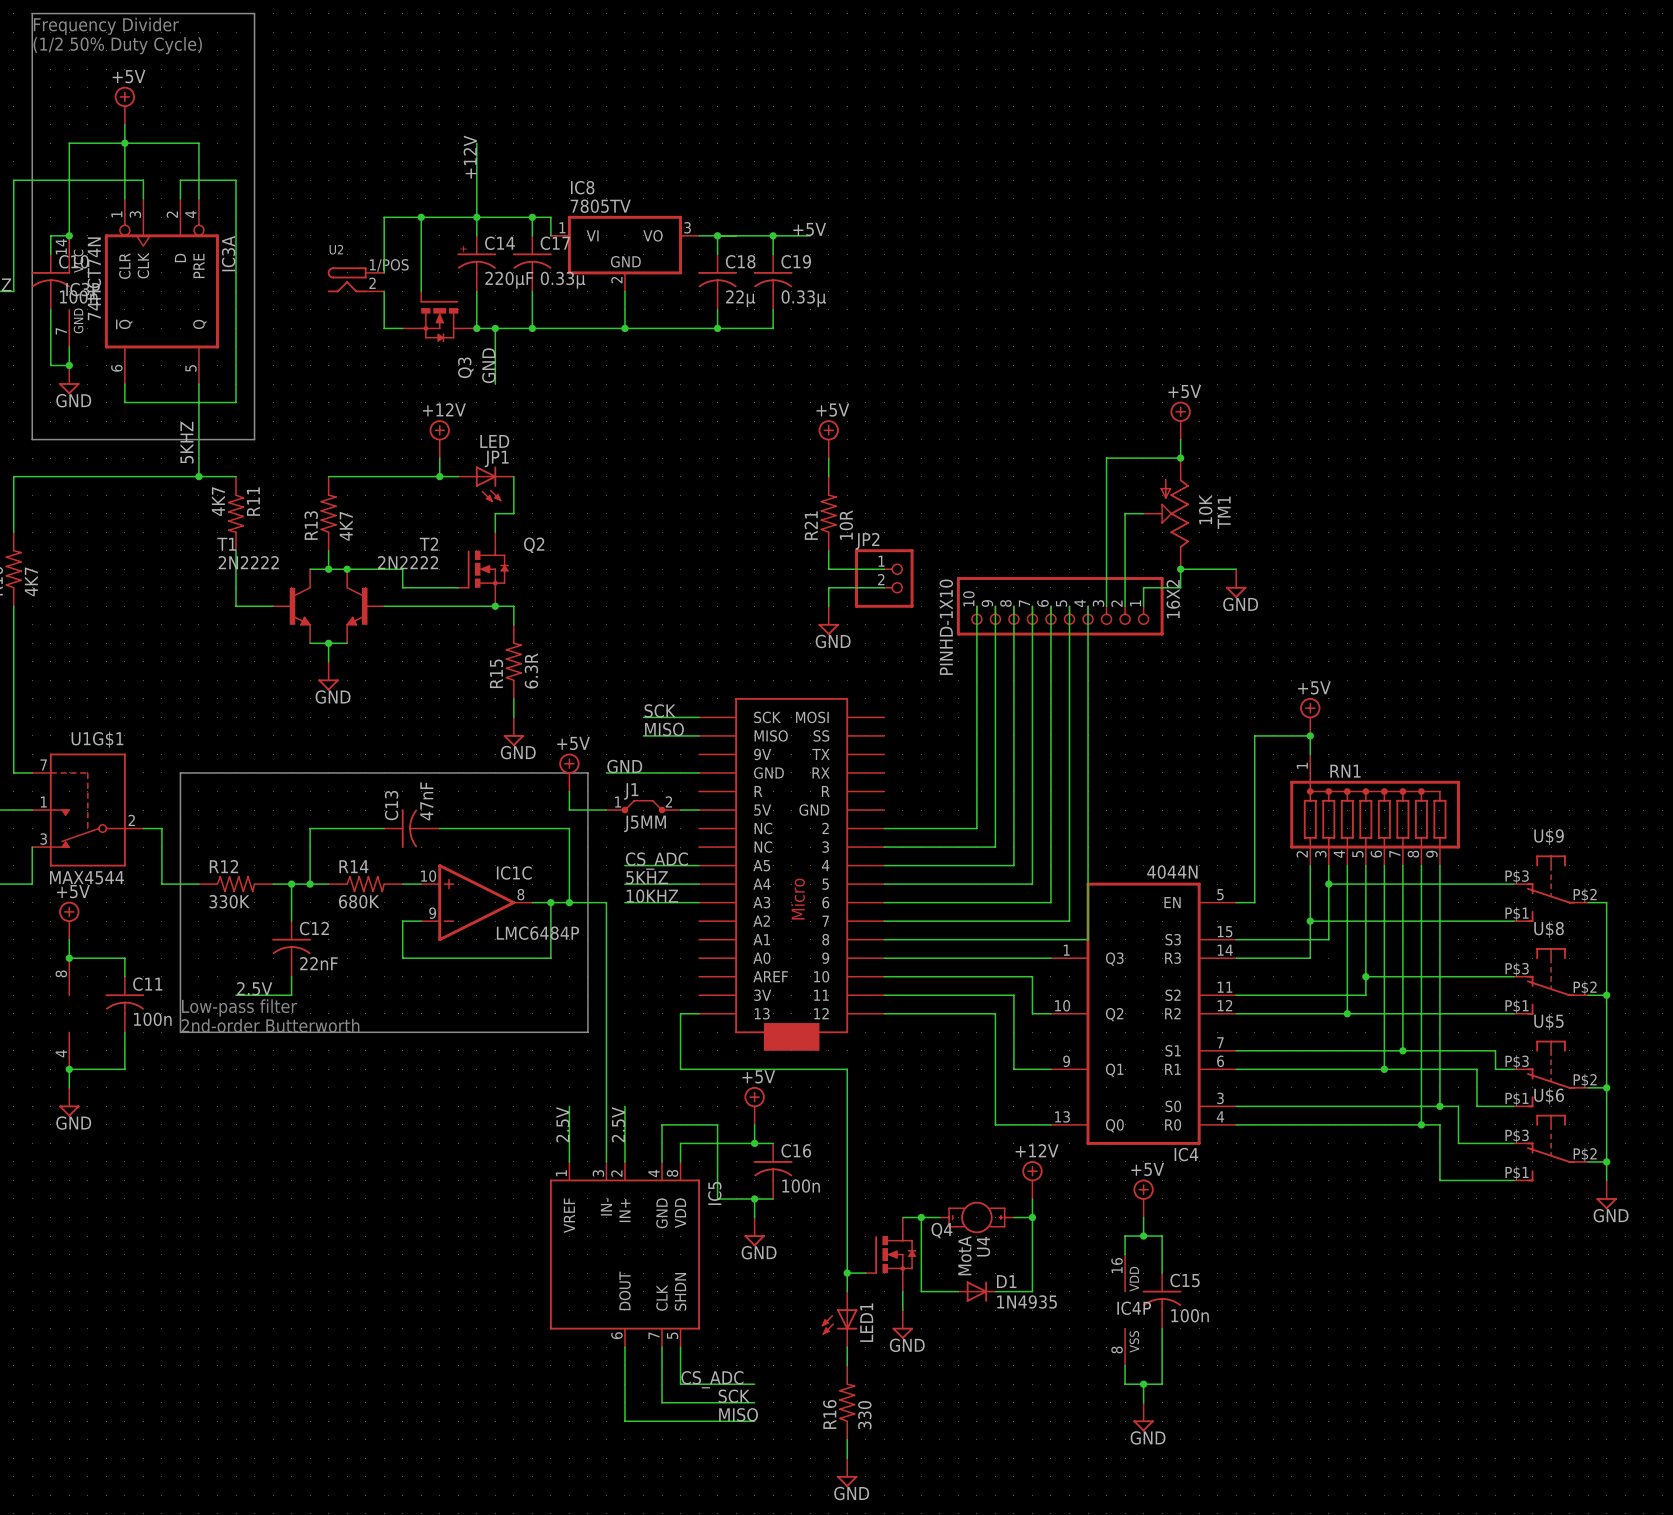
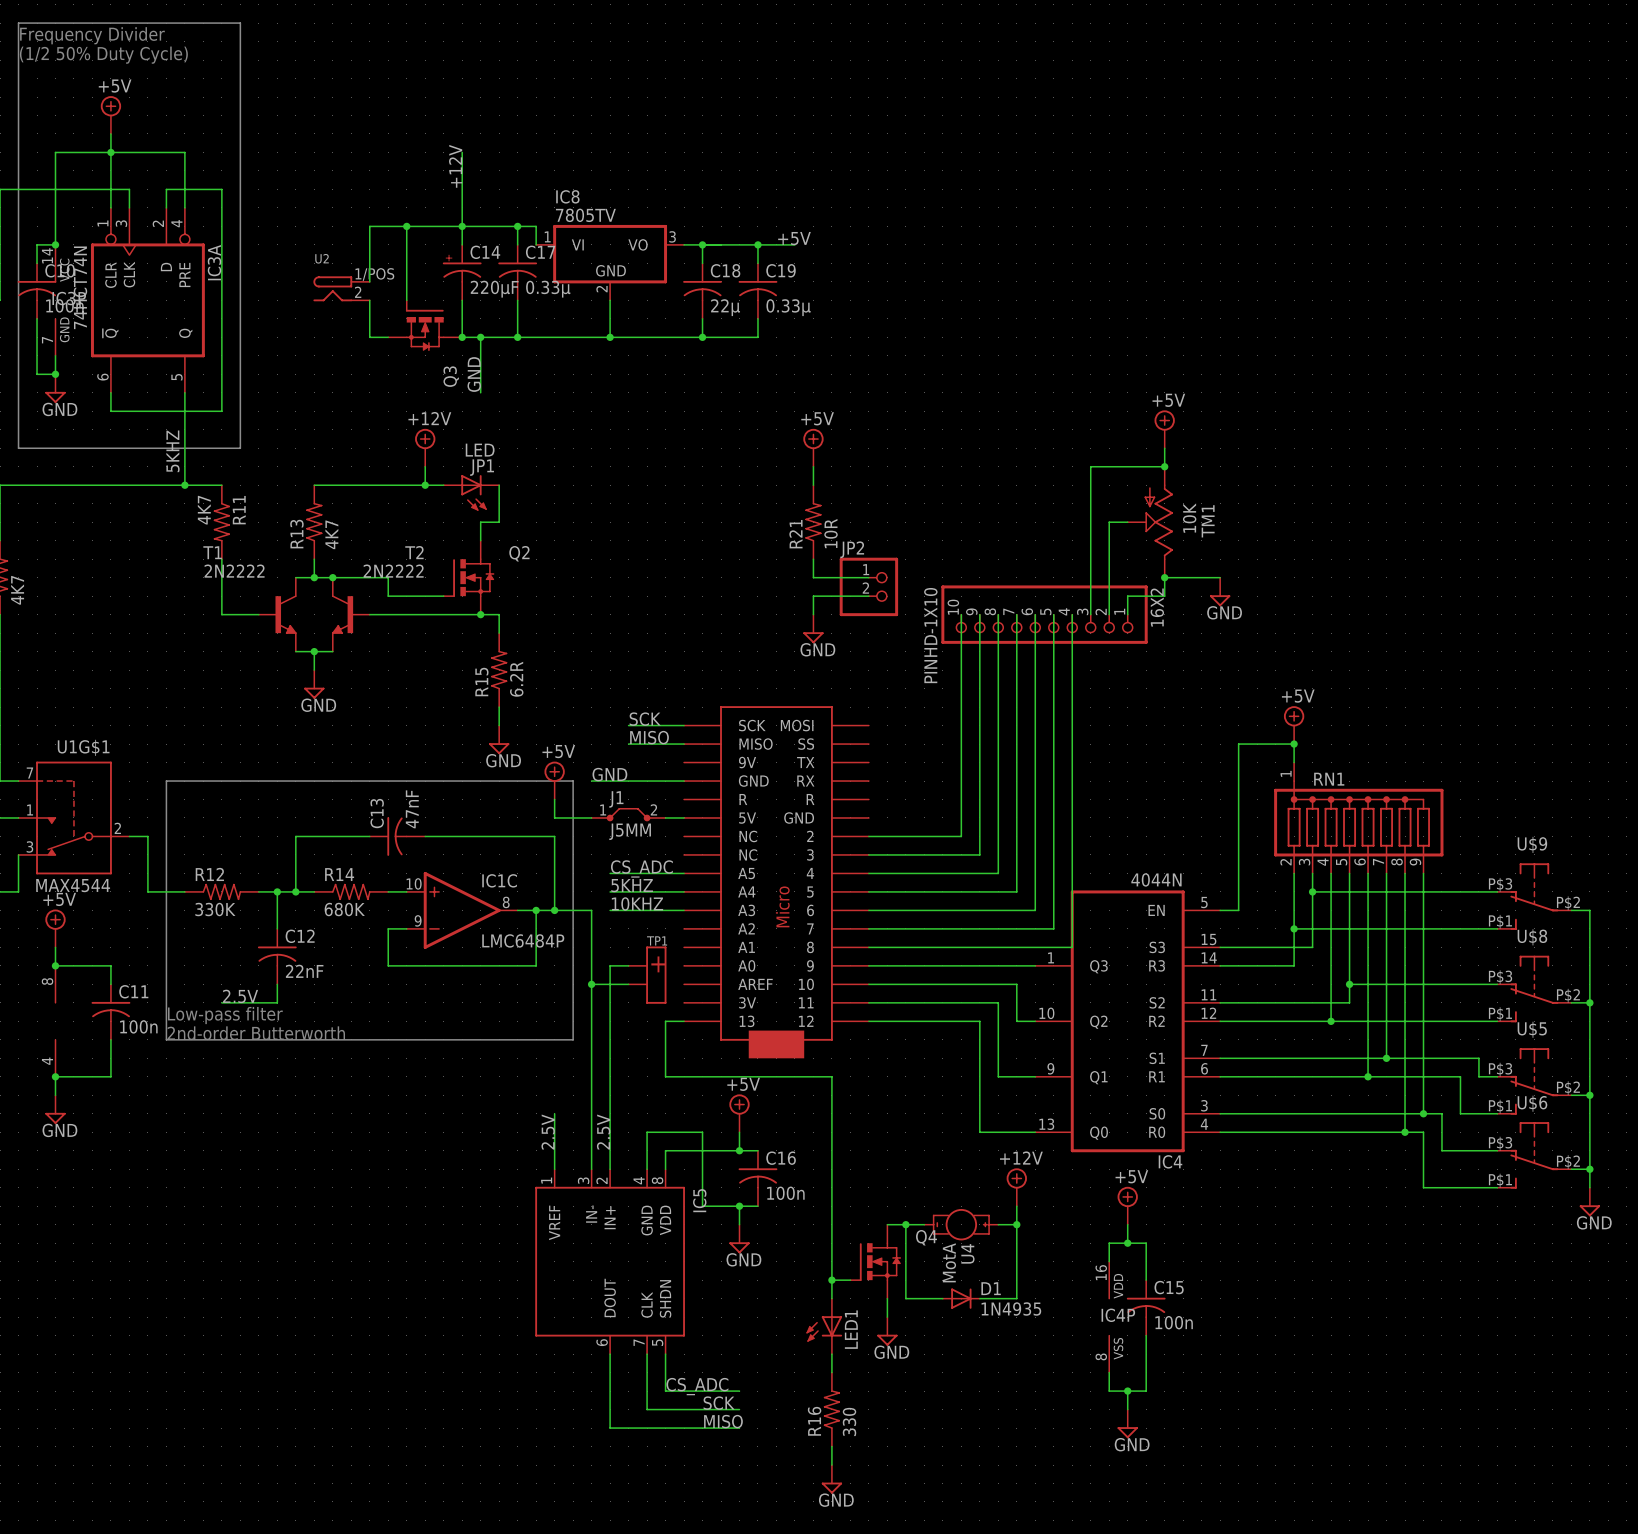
R15 value: 6.3R (531, 671) -> 6.2R (516, 679)
wire: none -> (628, 965) (610, 965) (610, 1113)
TP1: none -> (647, 975)
wire: none -> (591, 984) (628, 984)
junction: none -> (591, 984)

